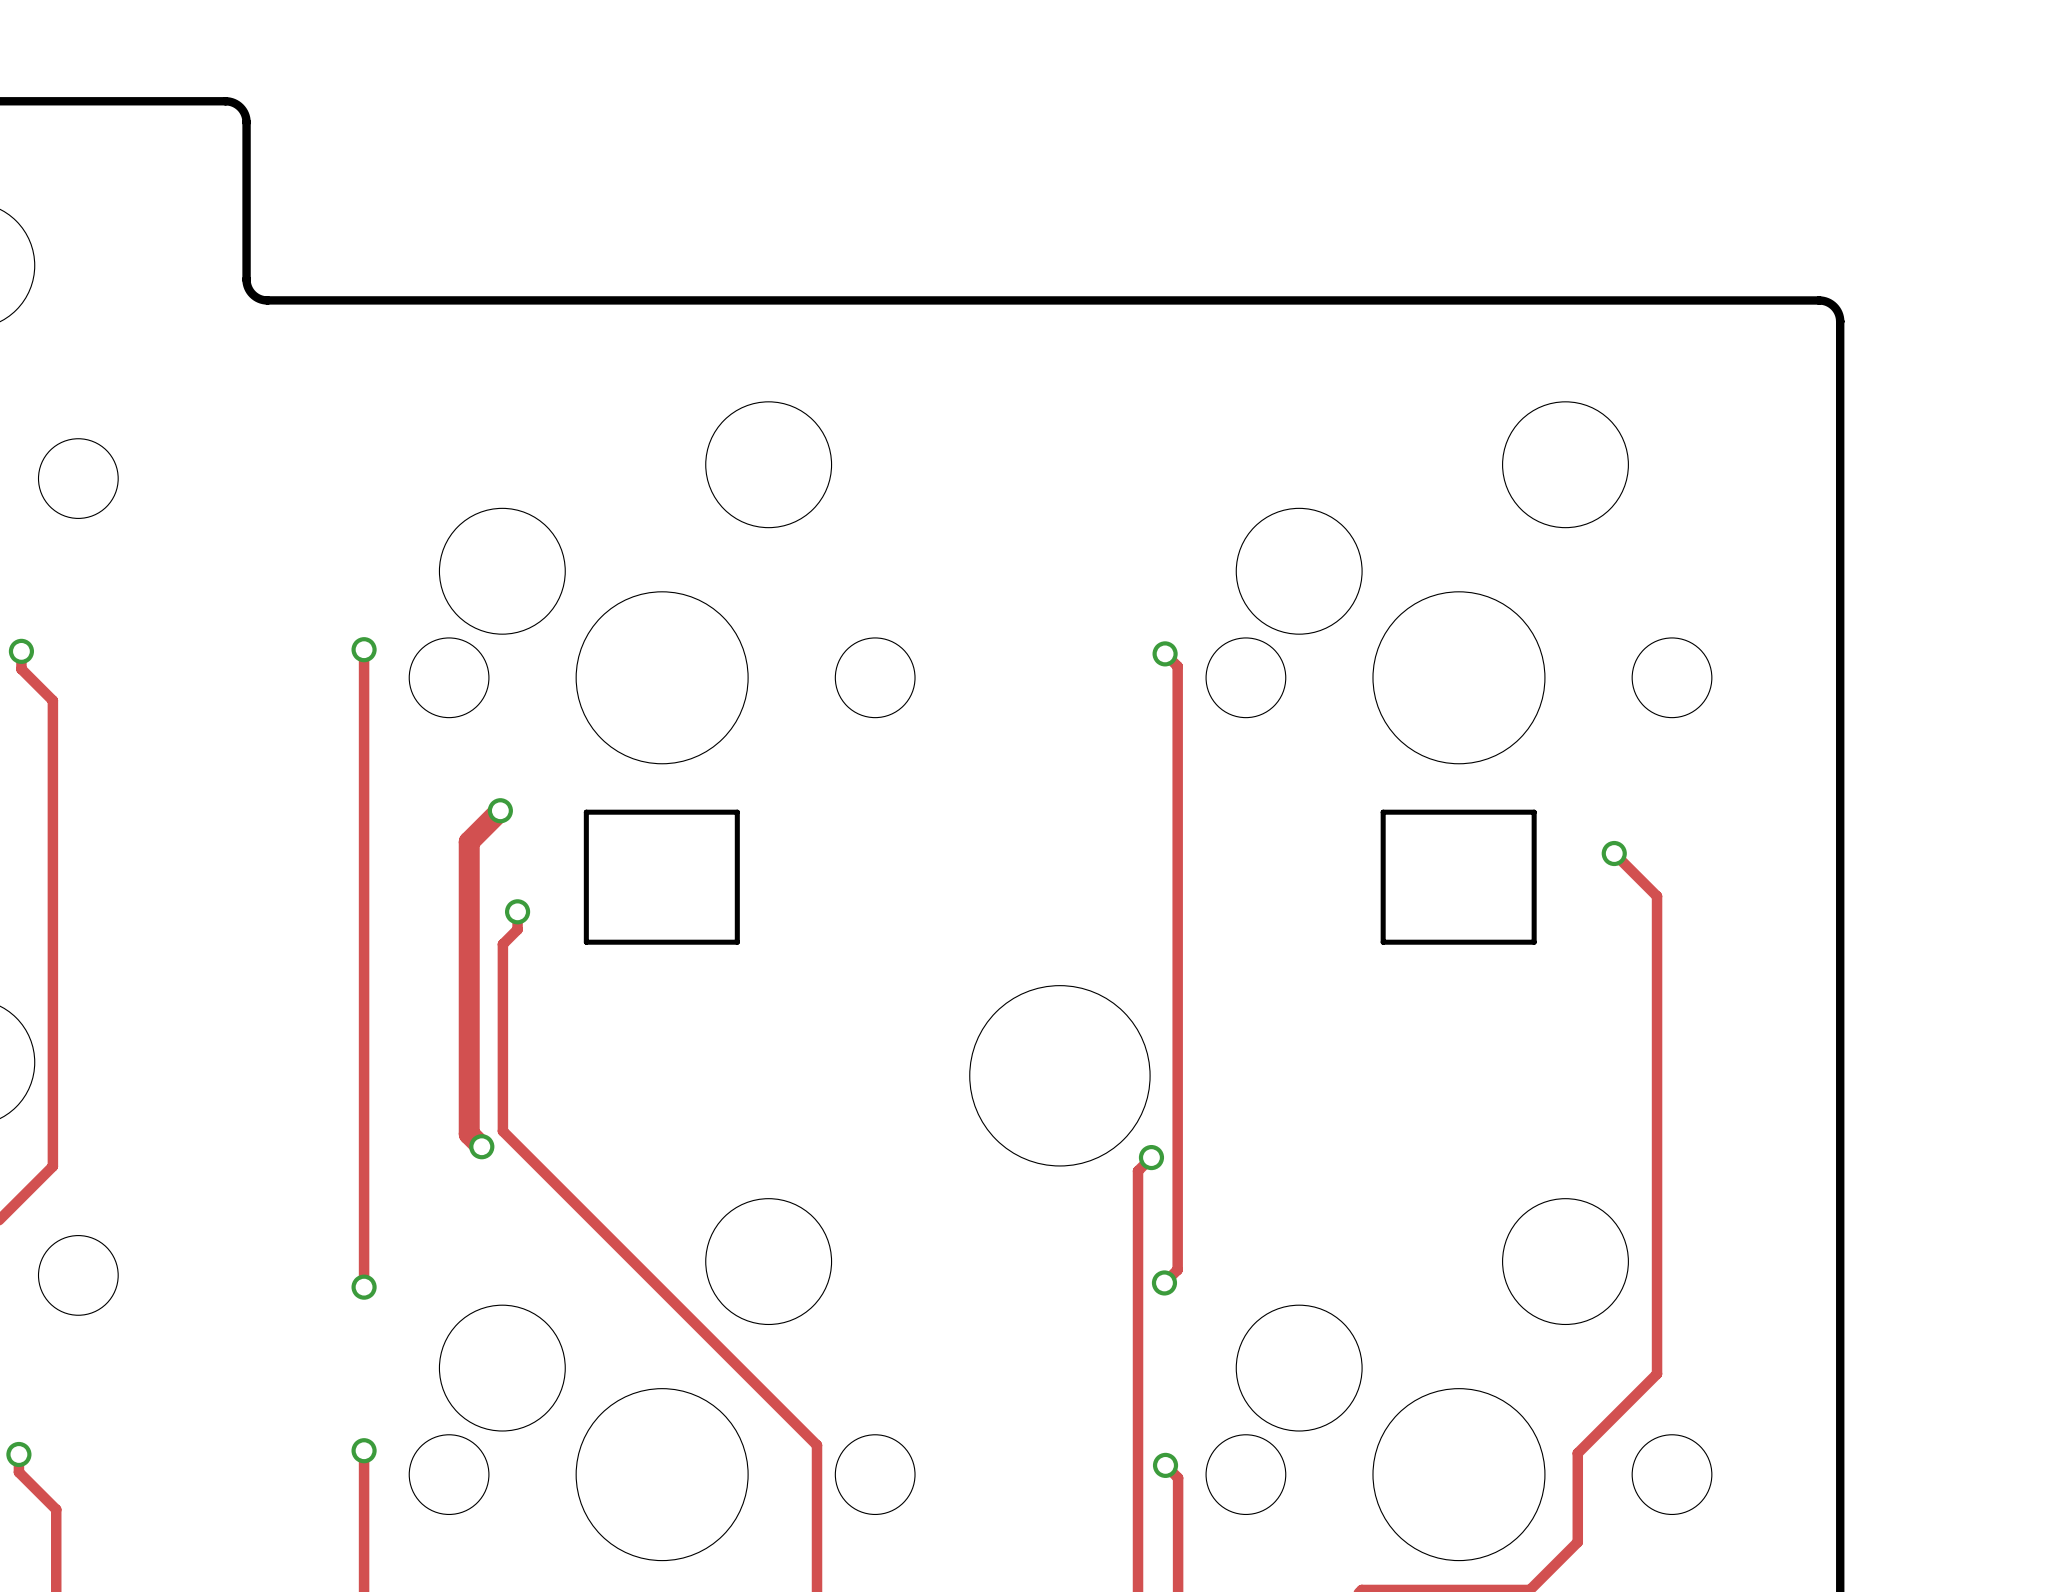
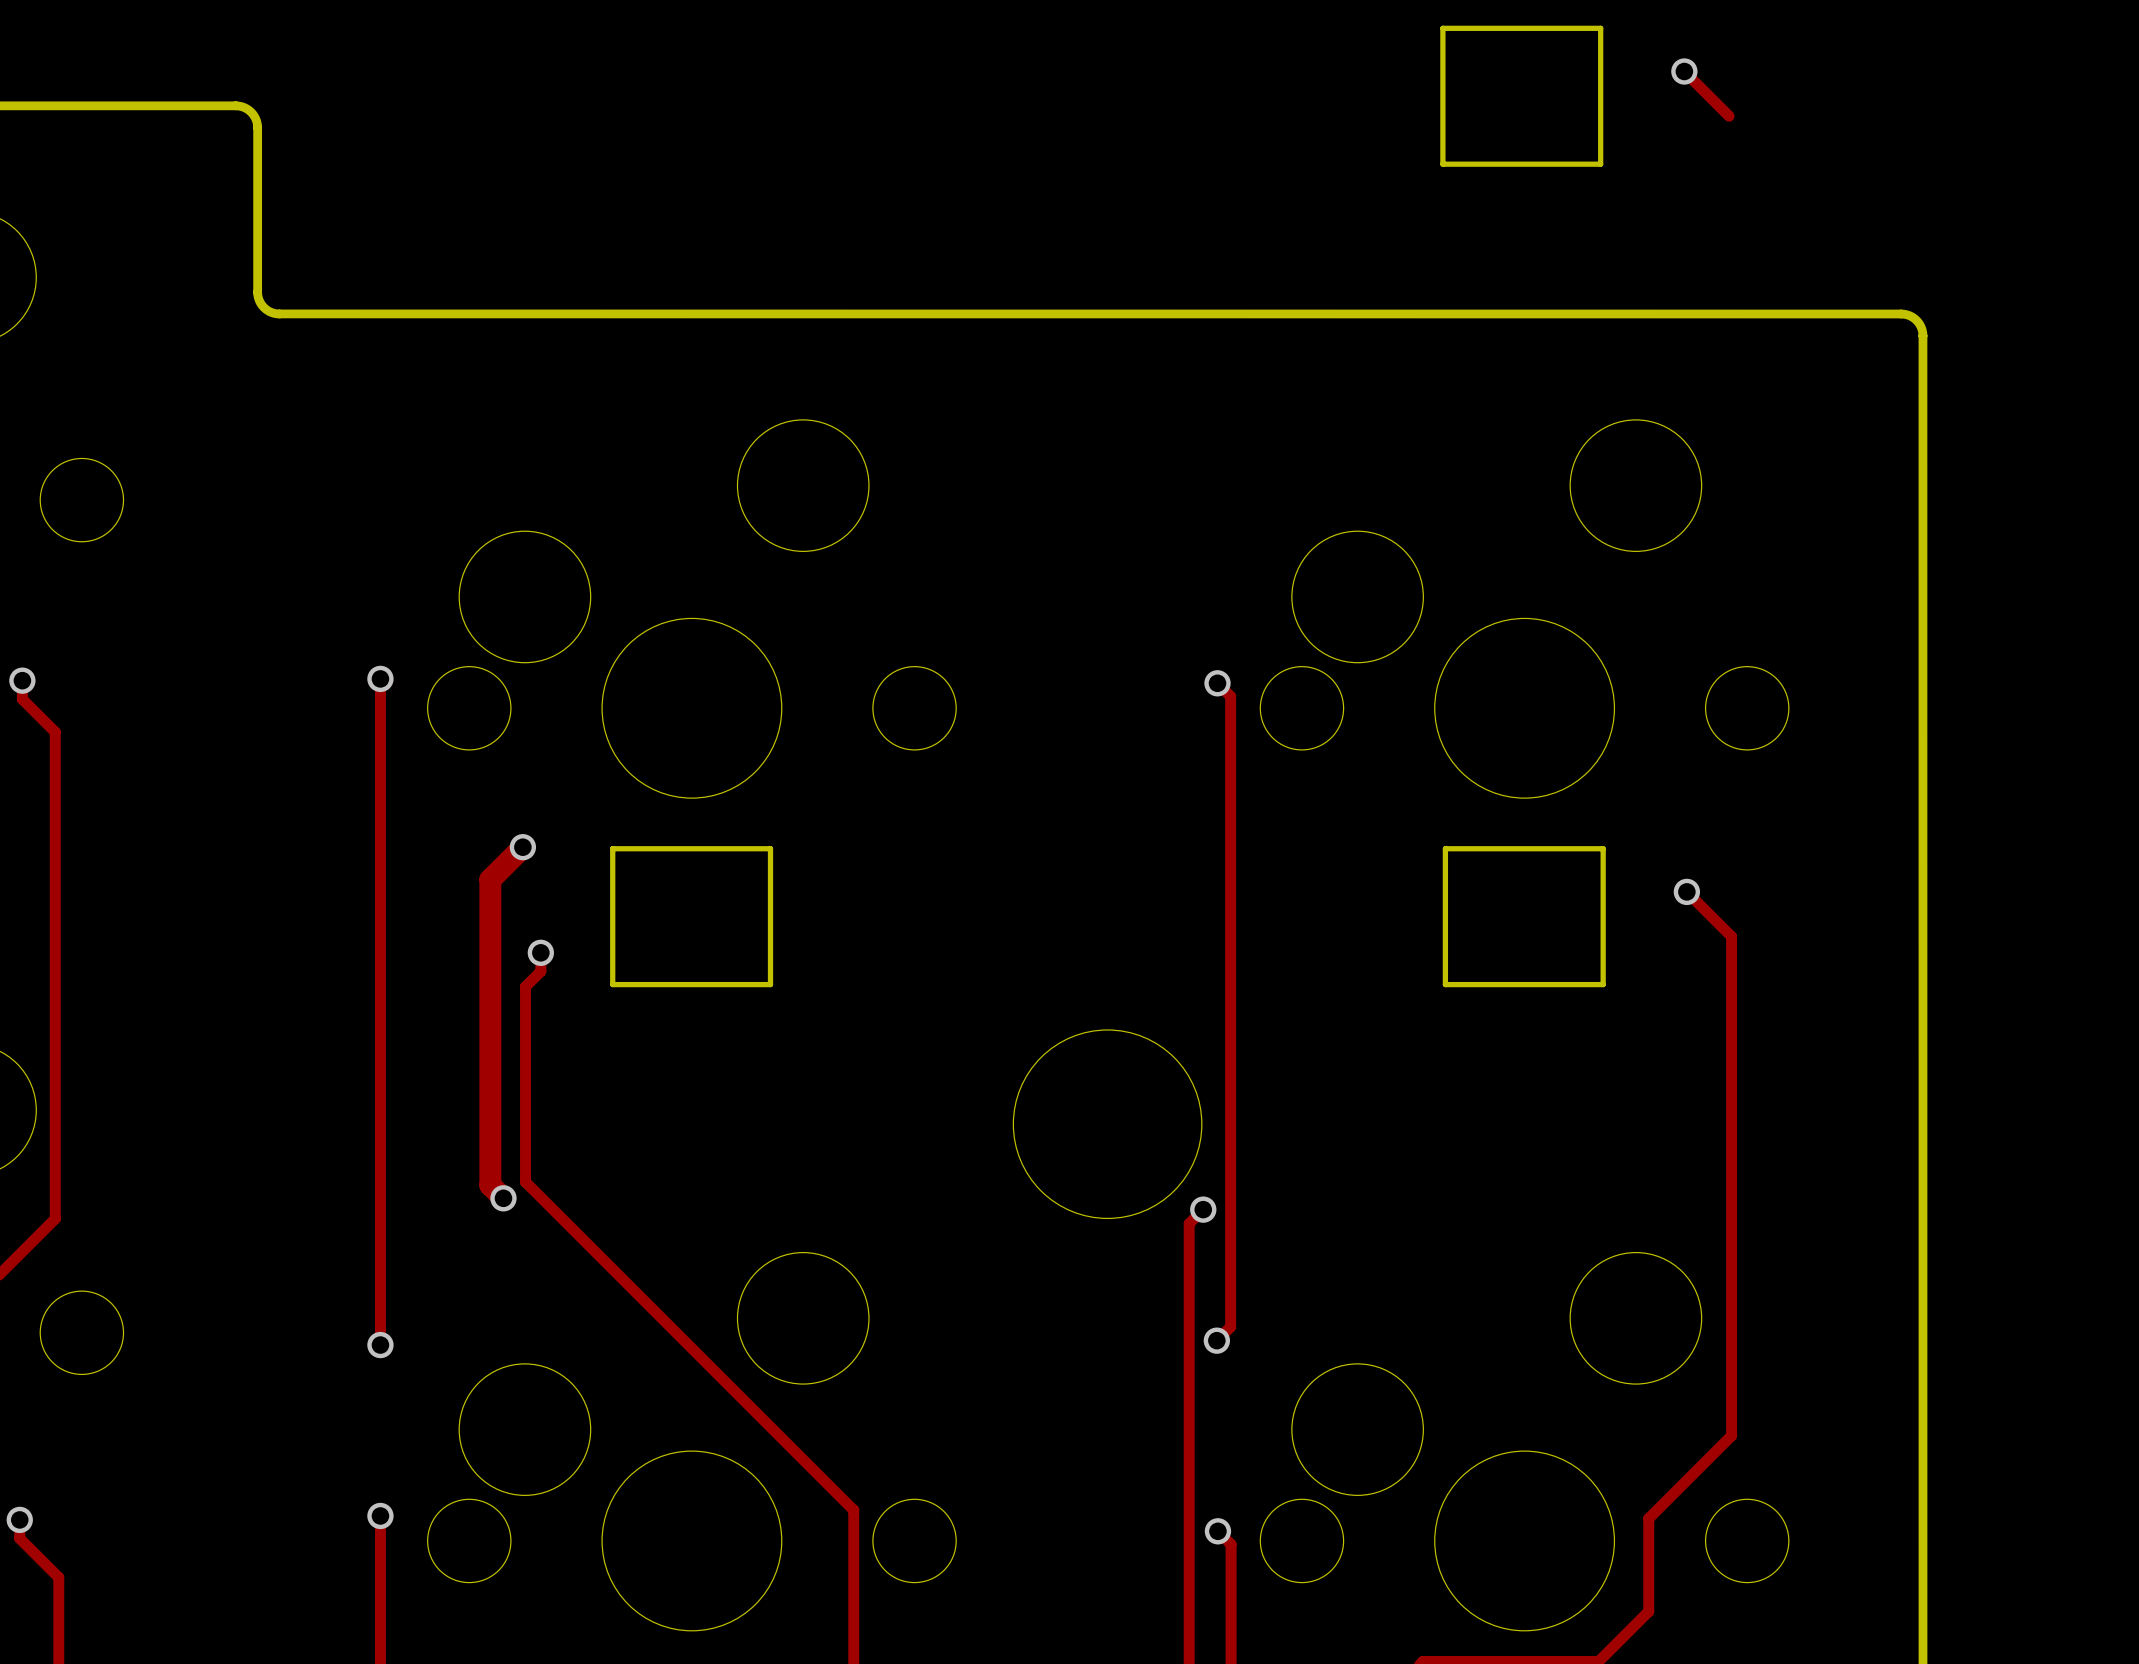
track: none -> (1684, 71) (1729, 116)
via: none -> (1684, 71)
part: none -> (1521, 96)

